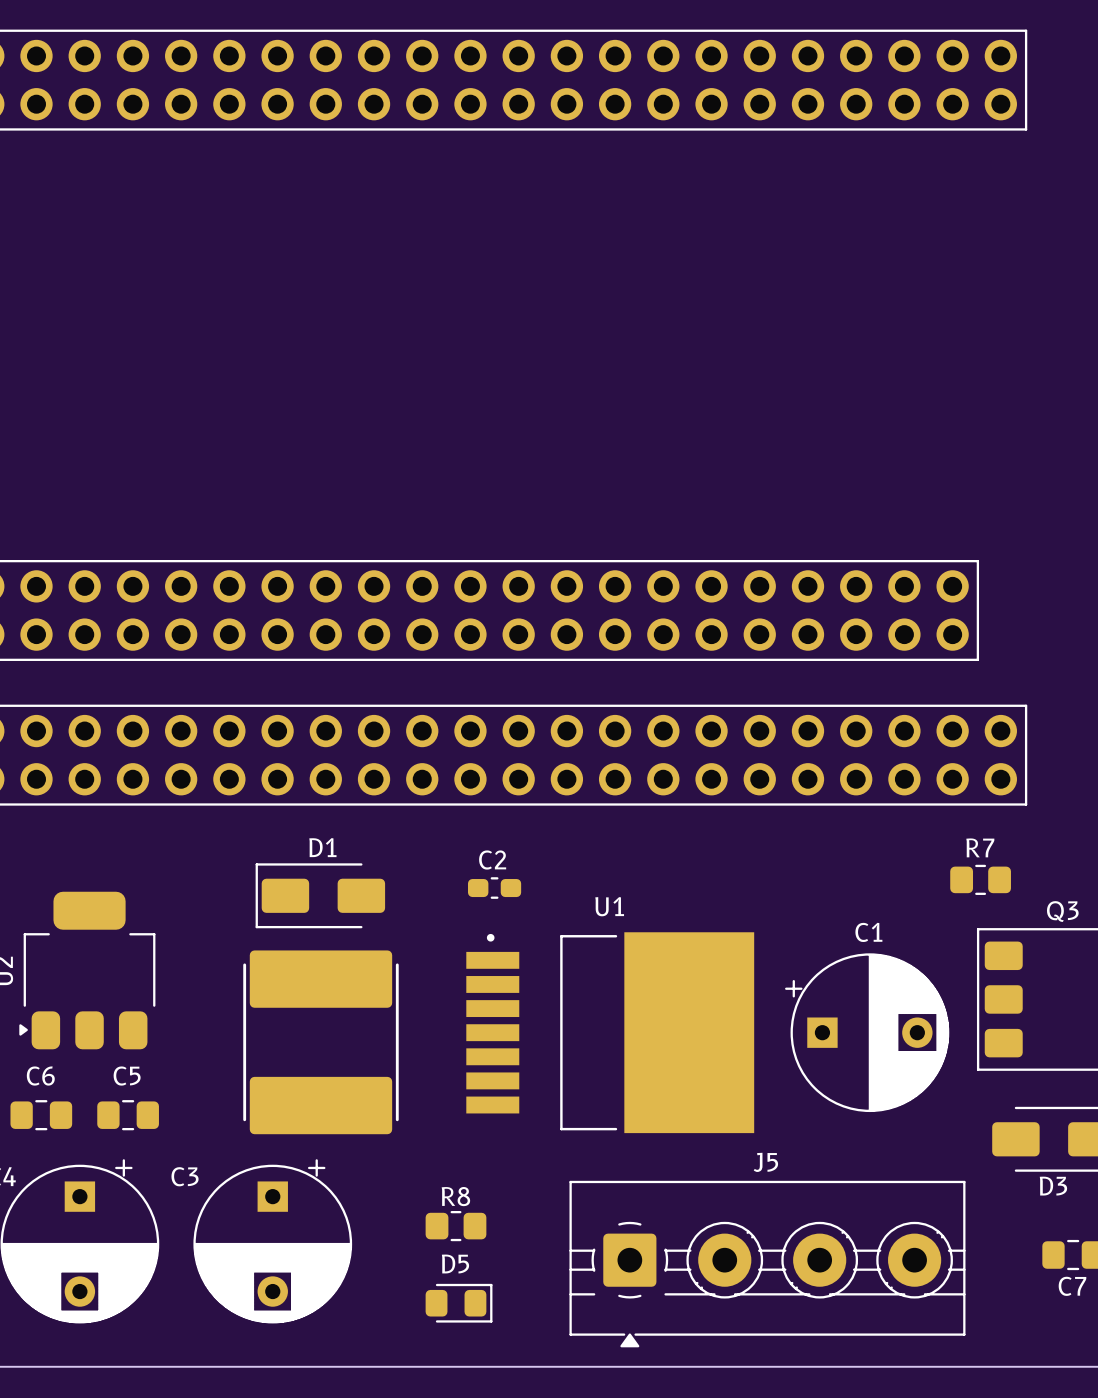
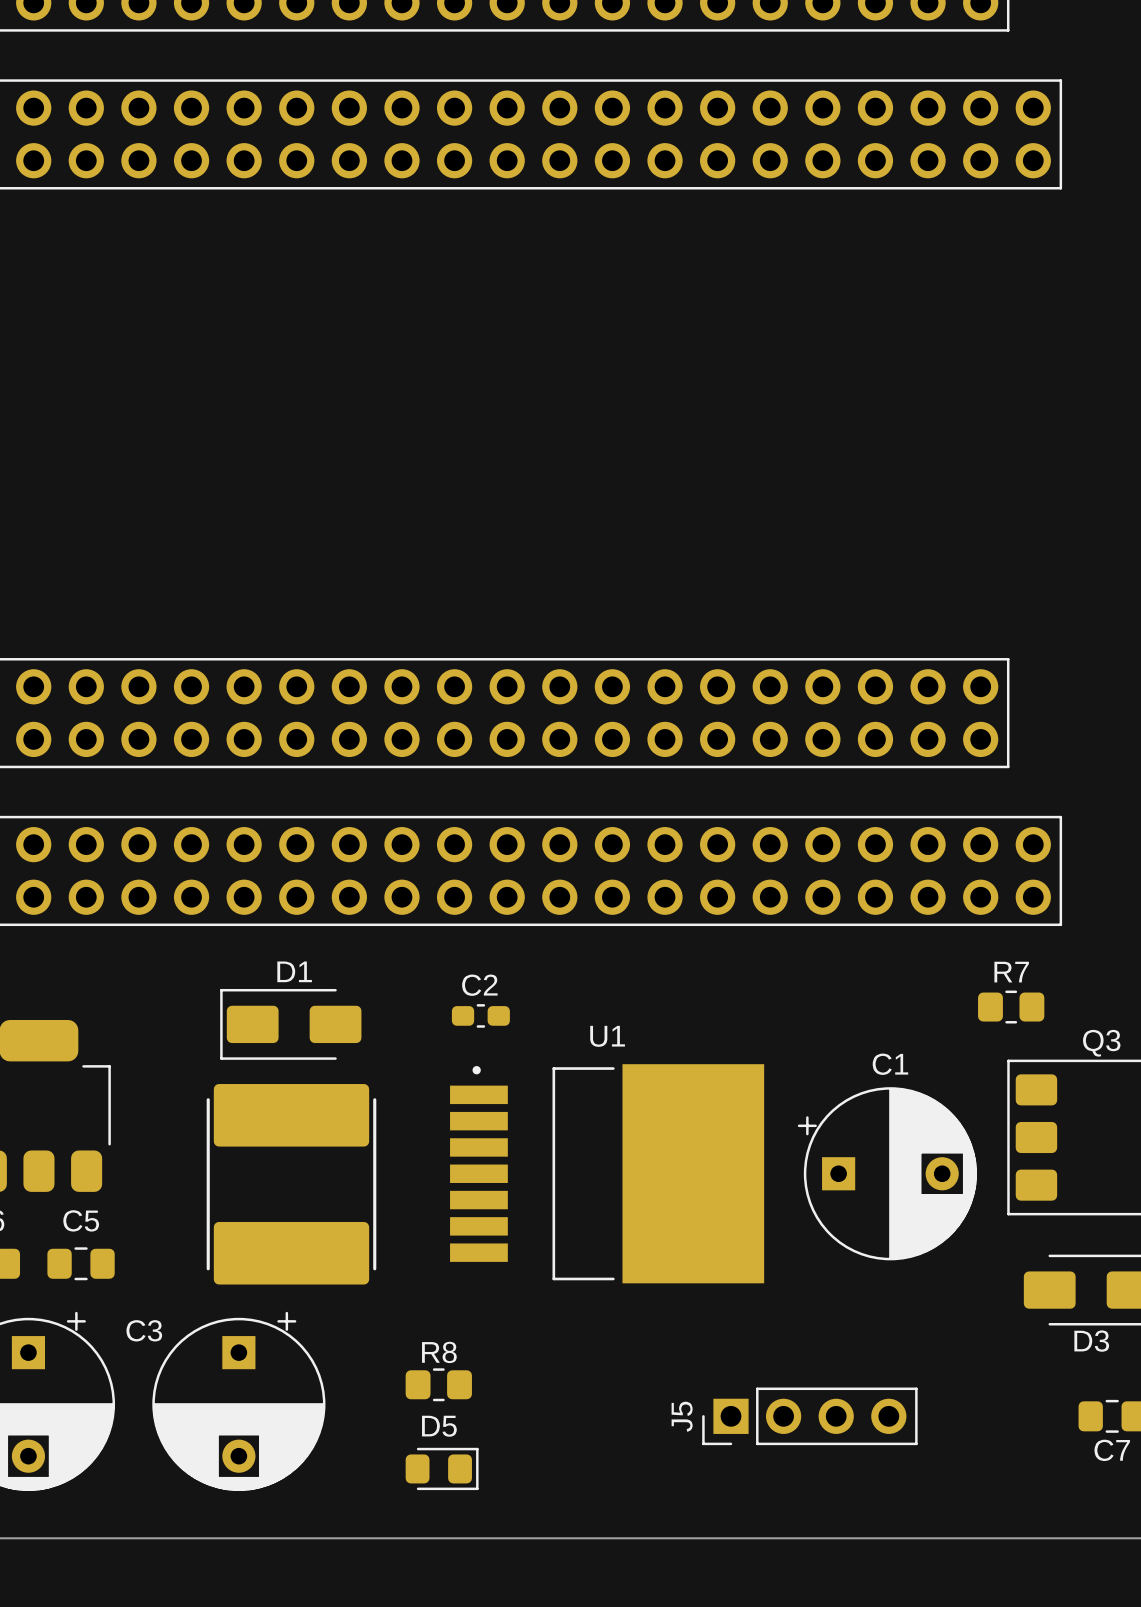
J5 name position: J5 (765, 1162) -> J5 (682, 1416)
J5 footprint: [569, 1180, 966, 1348] -> [702, 1387, 918, 1446]

